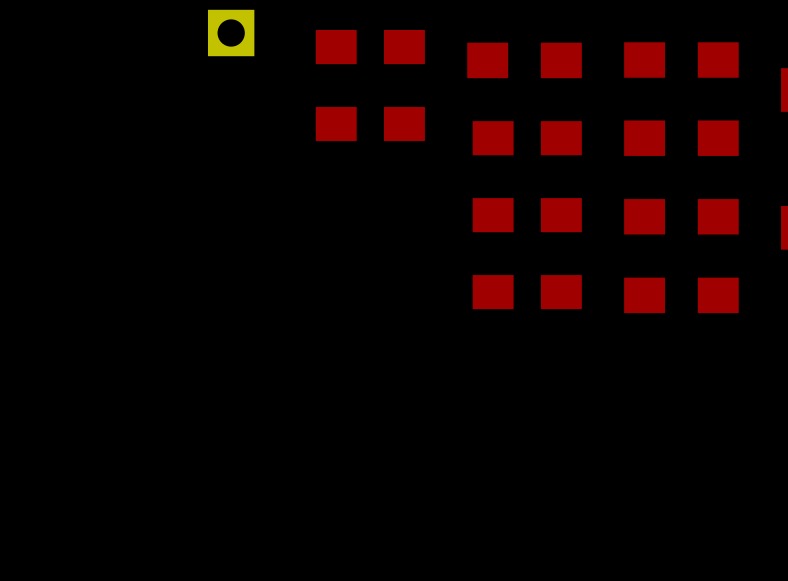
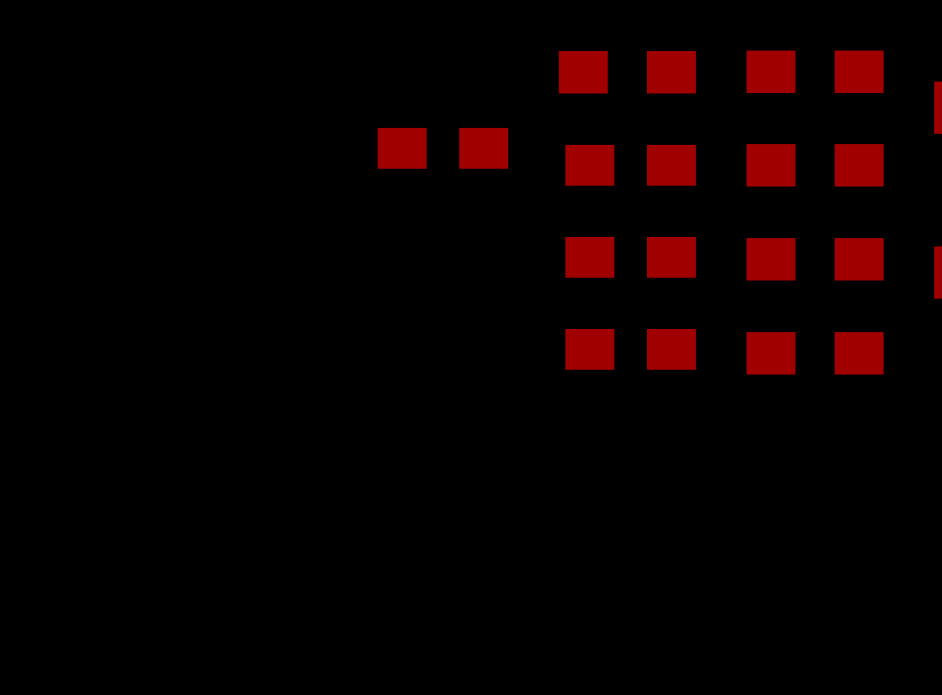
part: (231, 33) -> none
part: (370, 47) -> none

